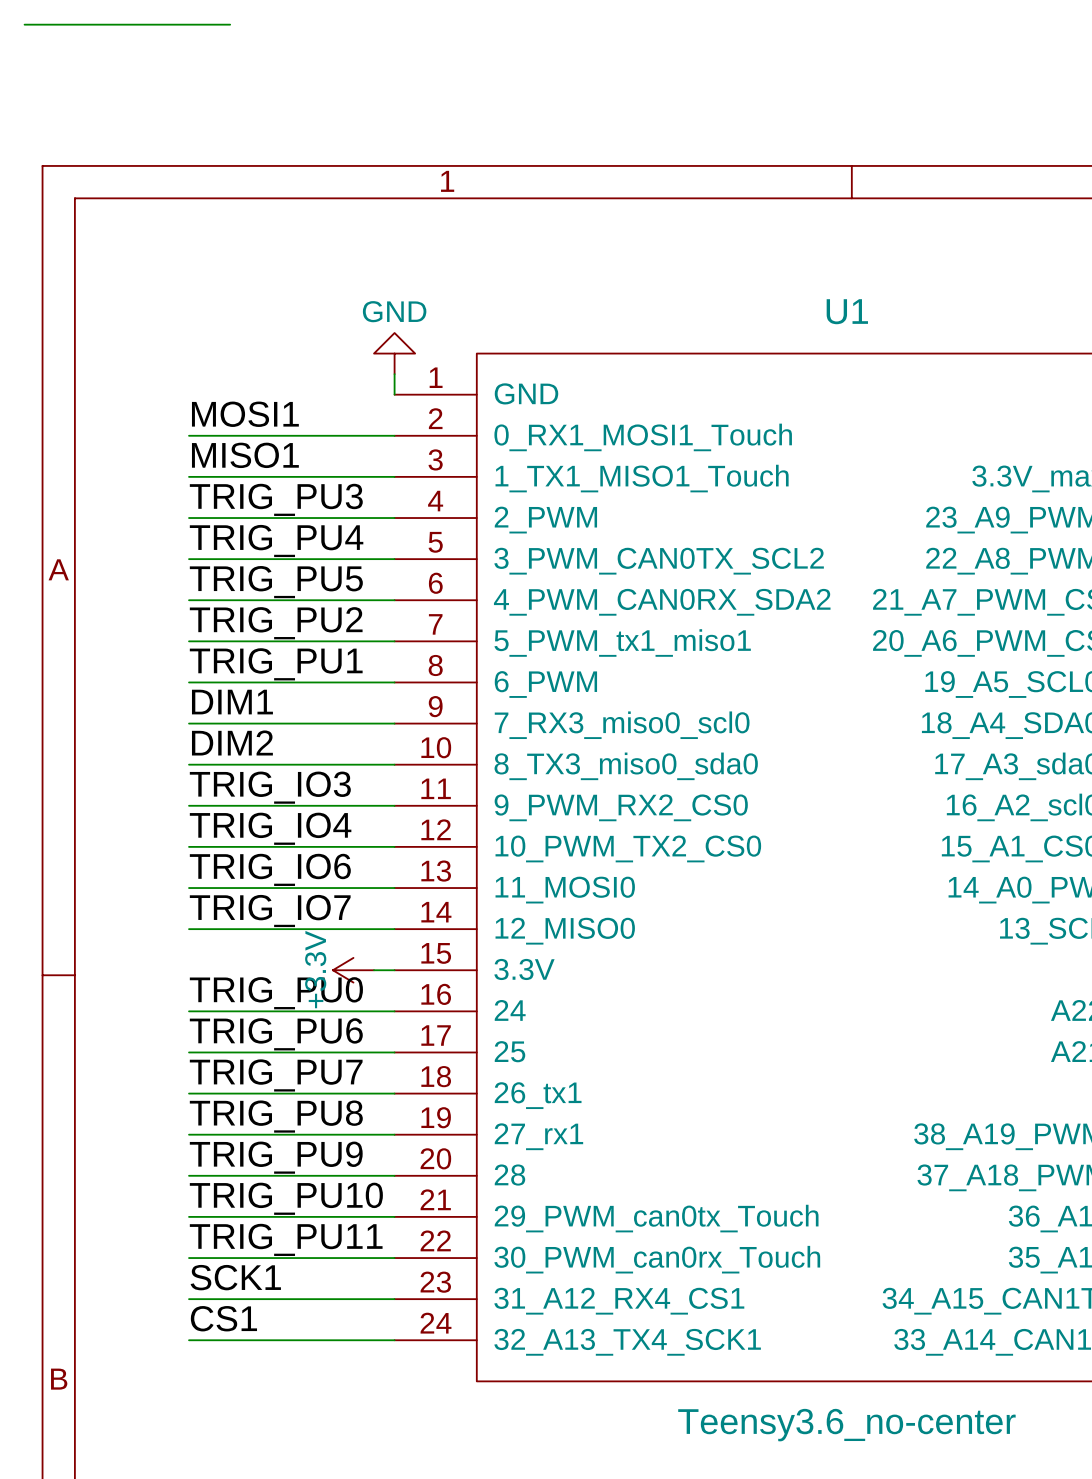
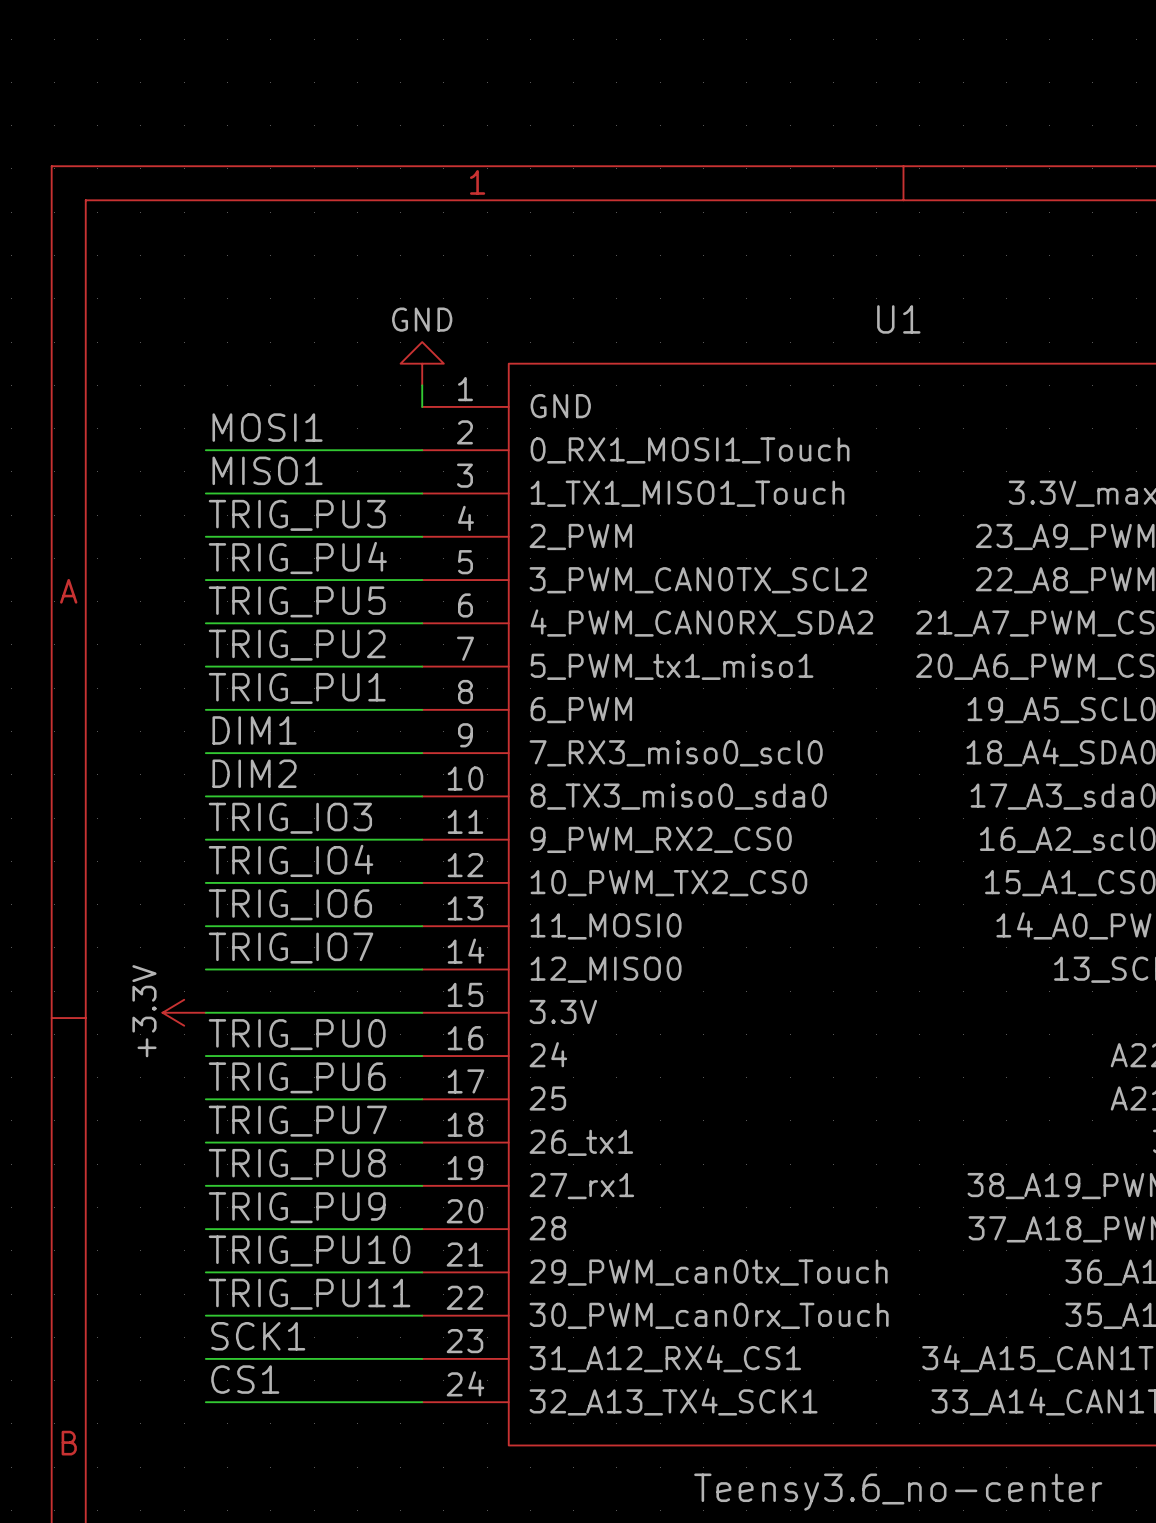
wire: (24, 24) (230, 24) -> none
wire: none -> (205, 1012) (400, 1012)
power symbol position: +3.3V (353, 970) -> +3.3V (184, 1012)

